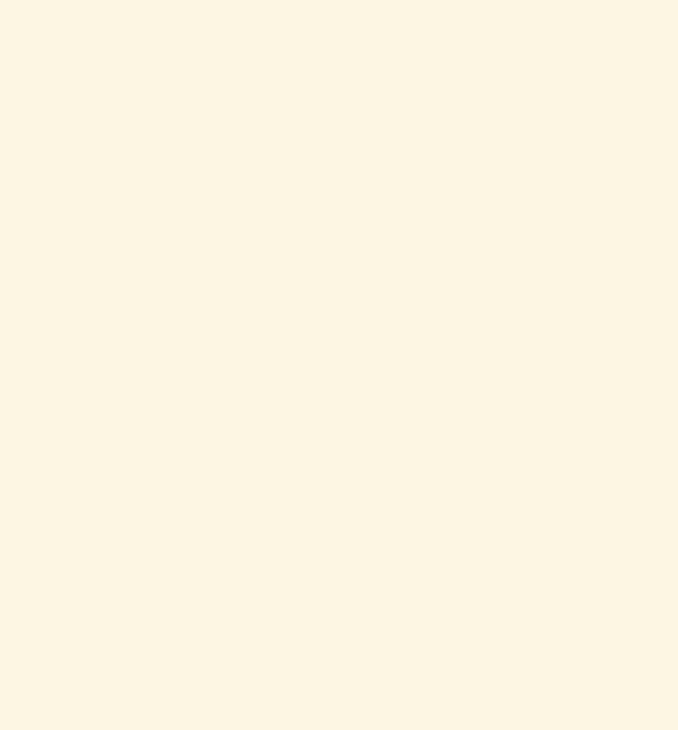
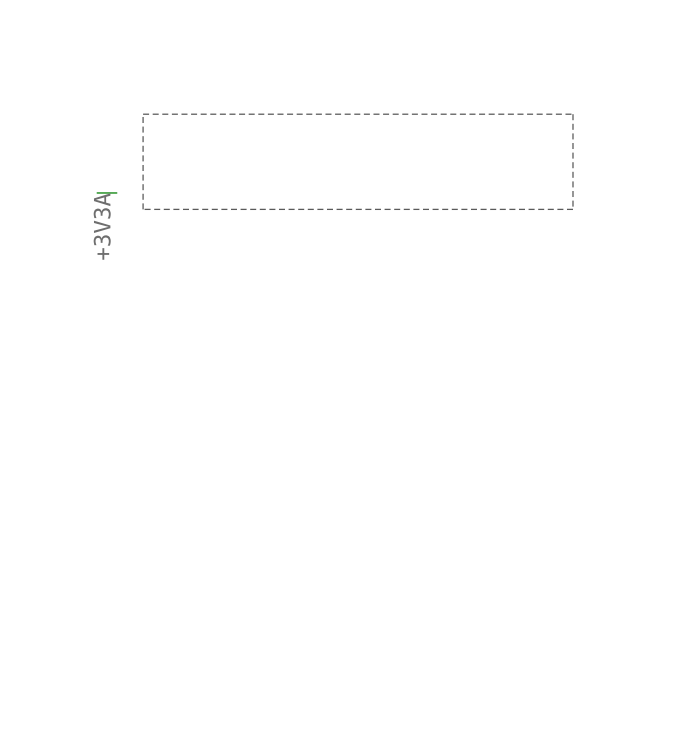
line: none -> (143, 114) (572, 114) (572, 209) (143, 209) (143, 114)
wire: none -> (97, 192) (116, 192)
label: none -> +3V3A (102, 226)

